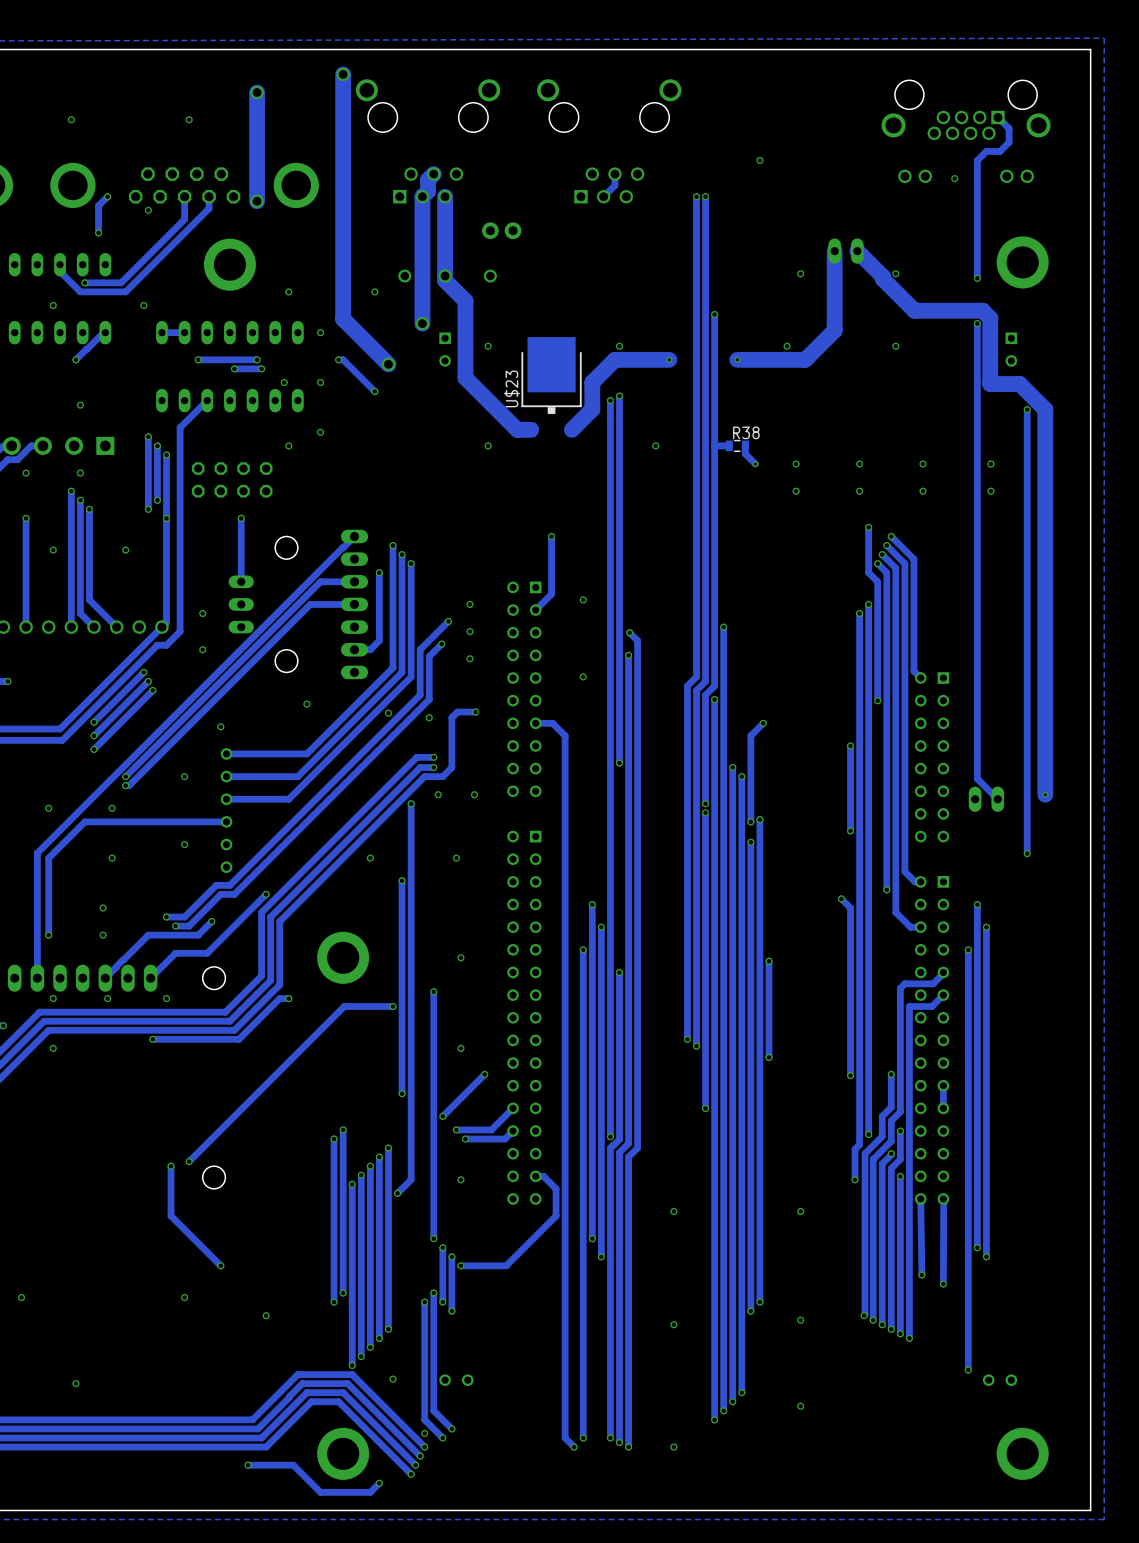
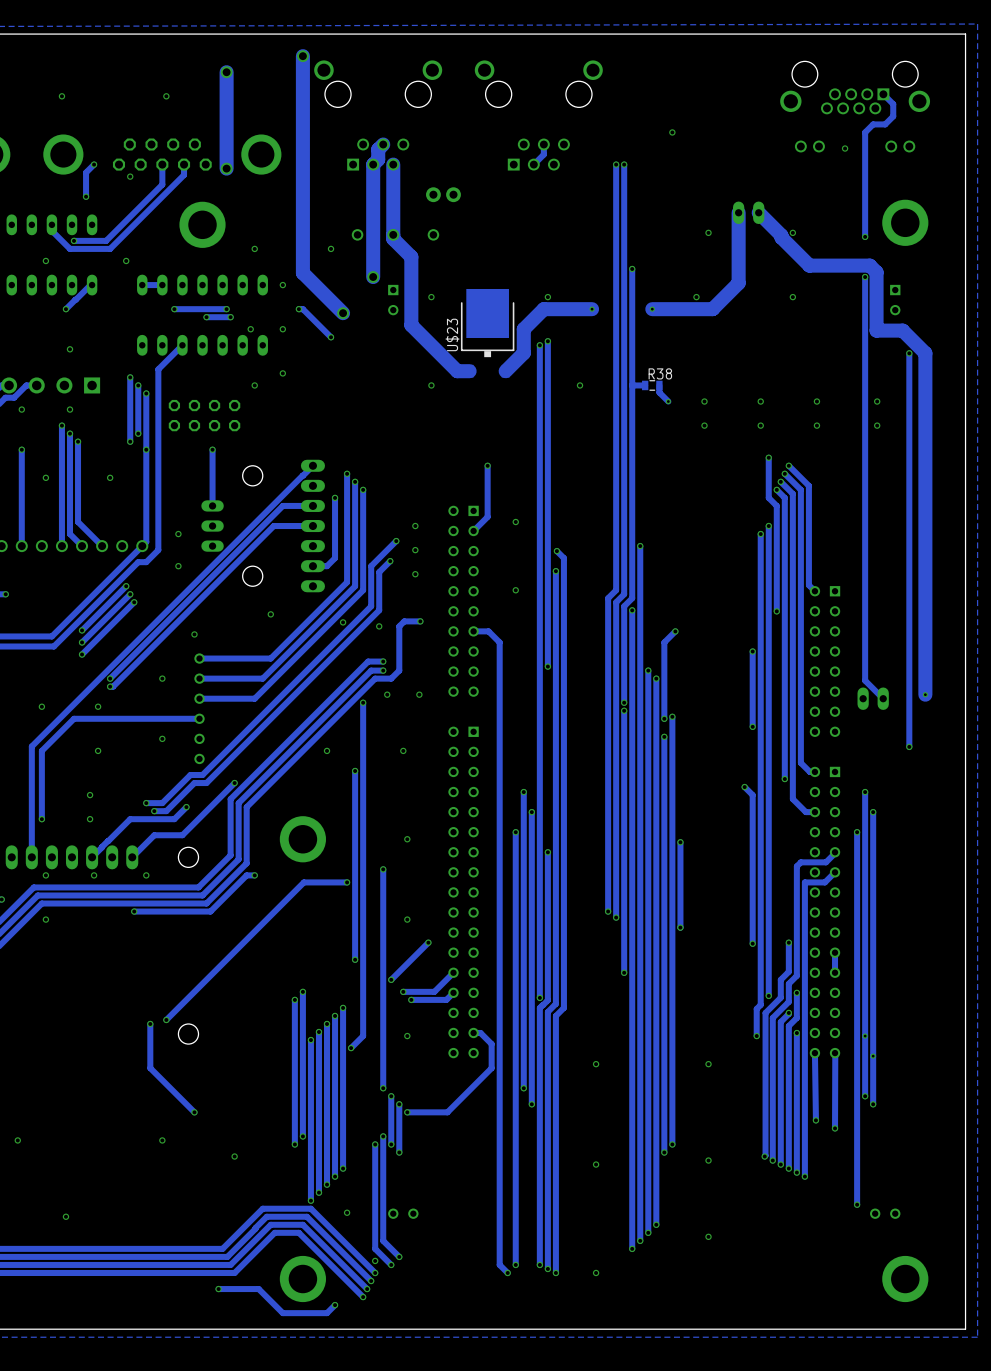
via: none -> (865, 1036)
via: none -> (873, 1056)

